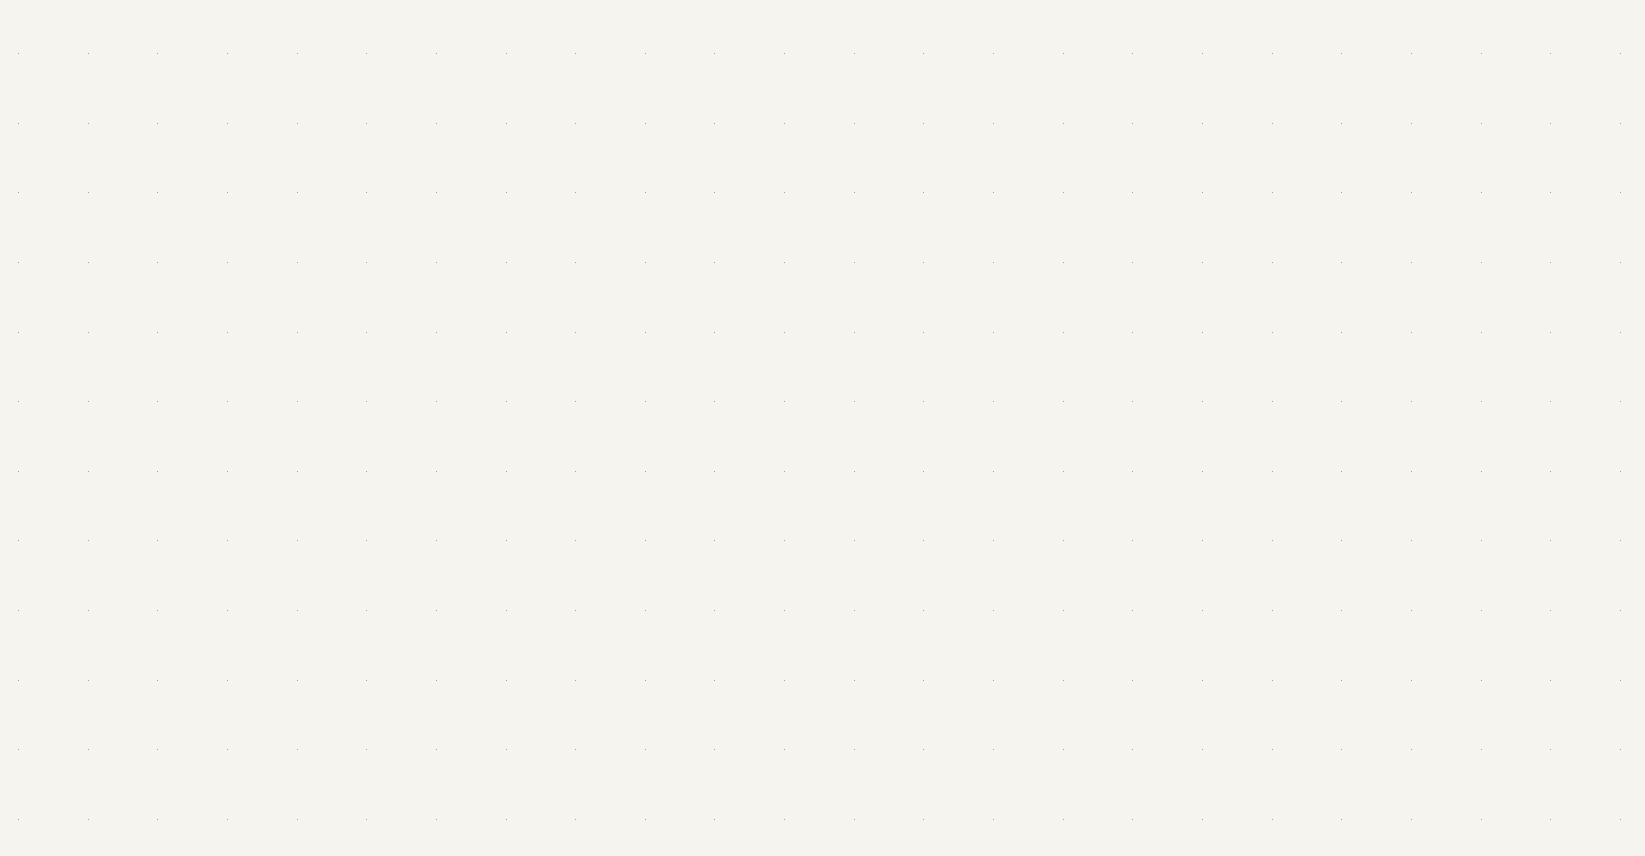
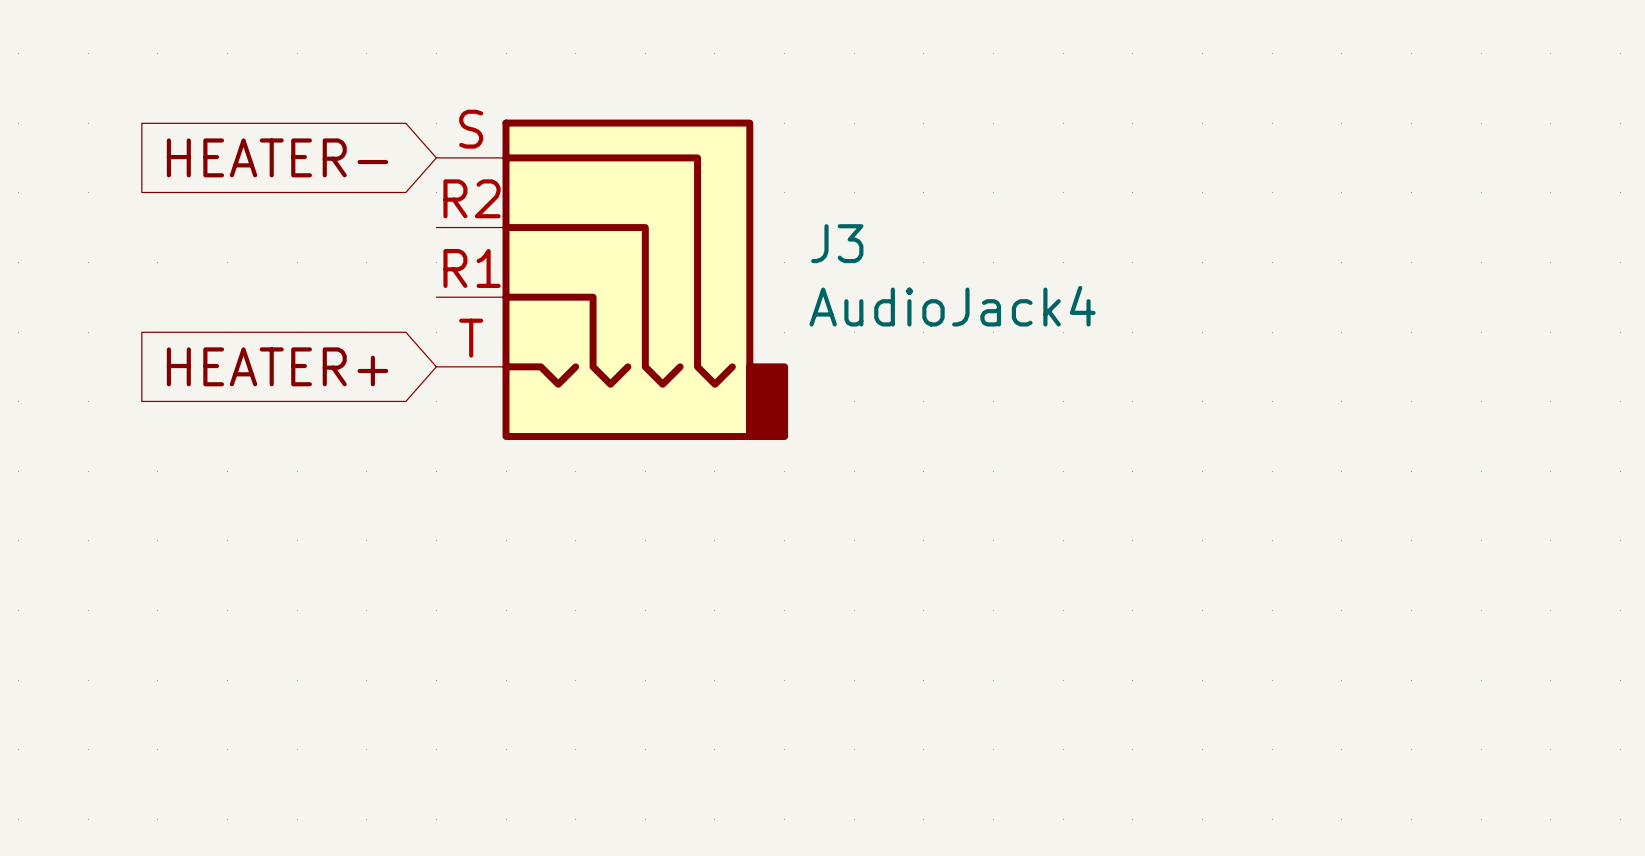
global label: none -> HEATER- (277, 157)
J3: none -> AudioJack4 (612, 279)
global label: none -> HEATER+ (277, 366)

